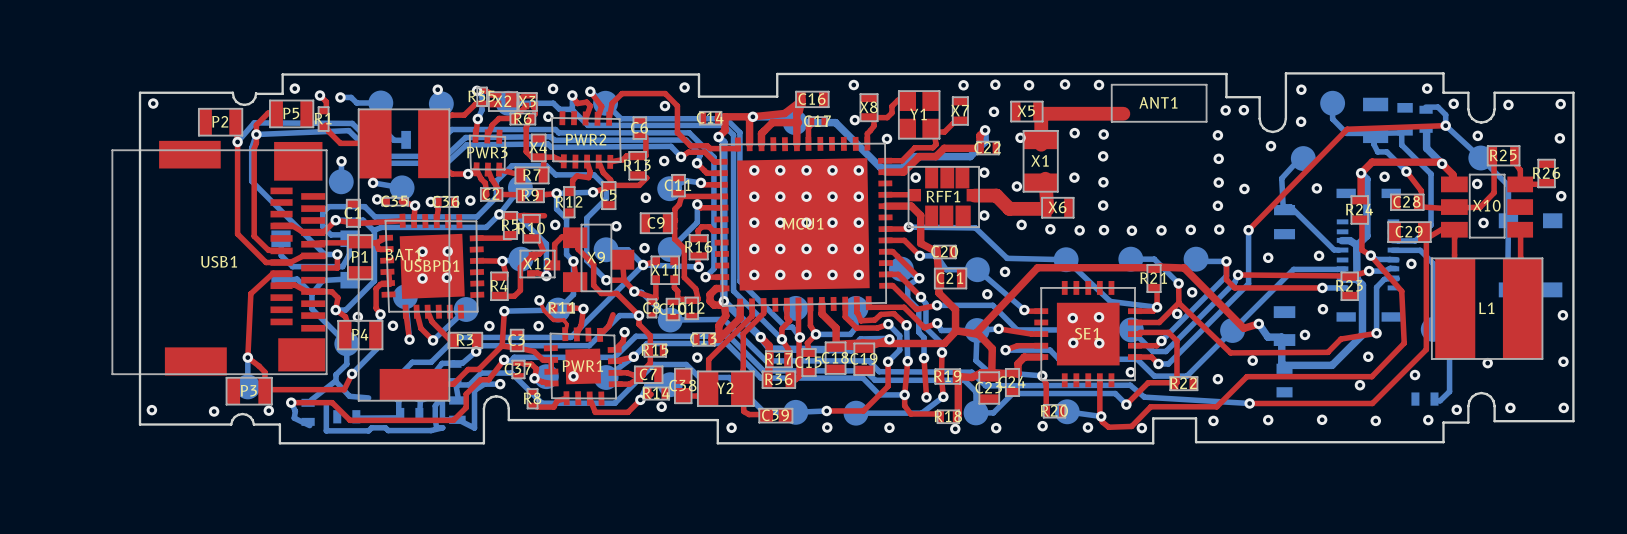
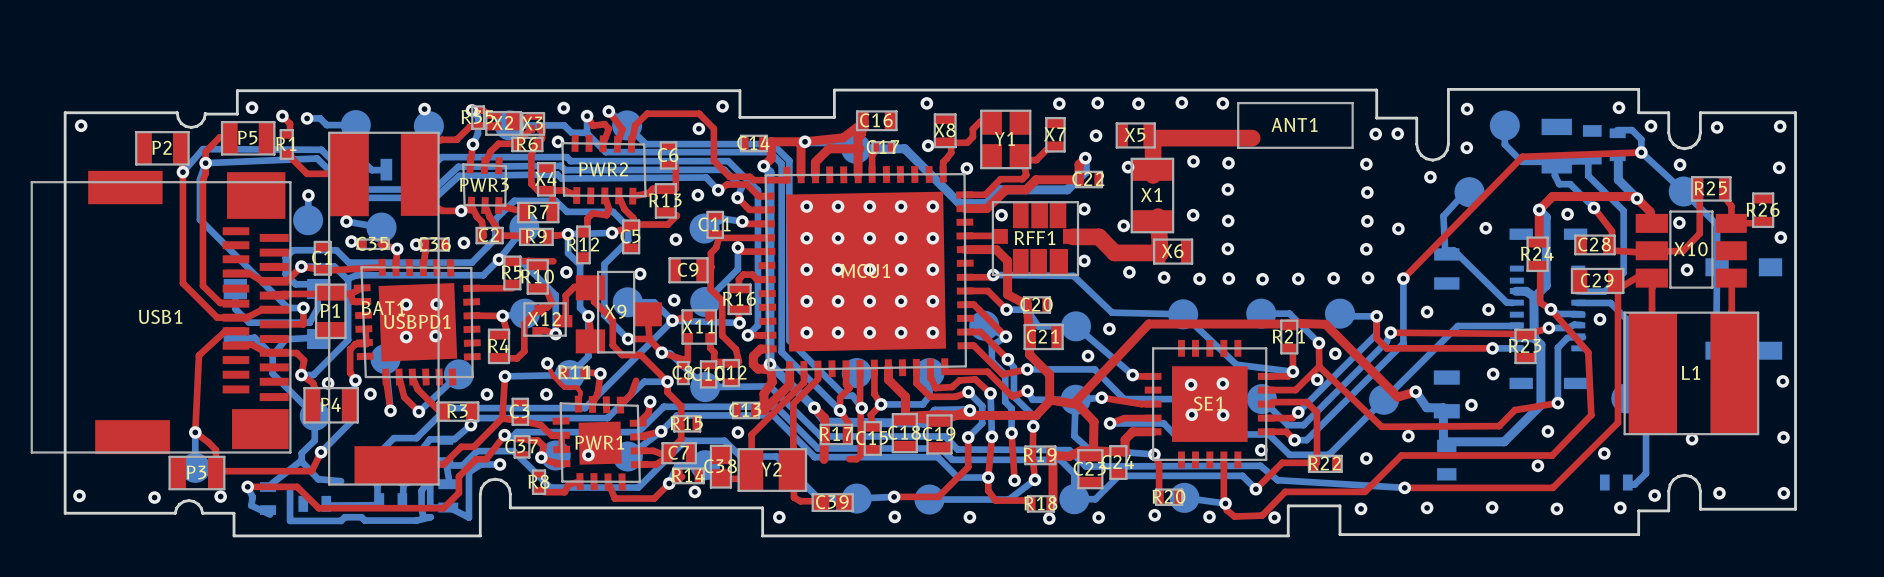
R36: (778, 379) -> none

